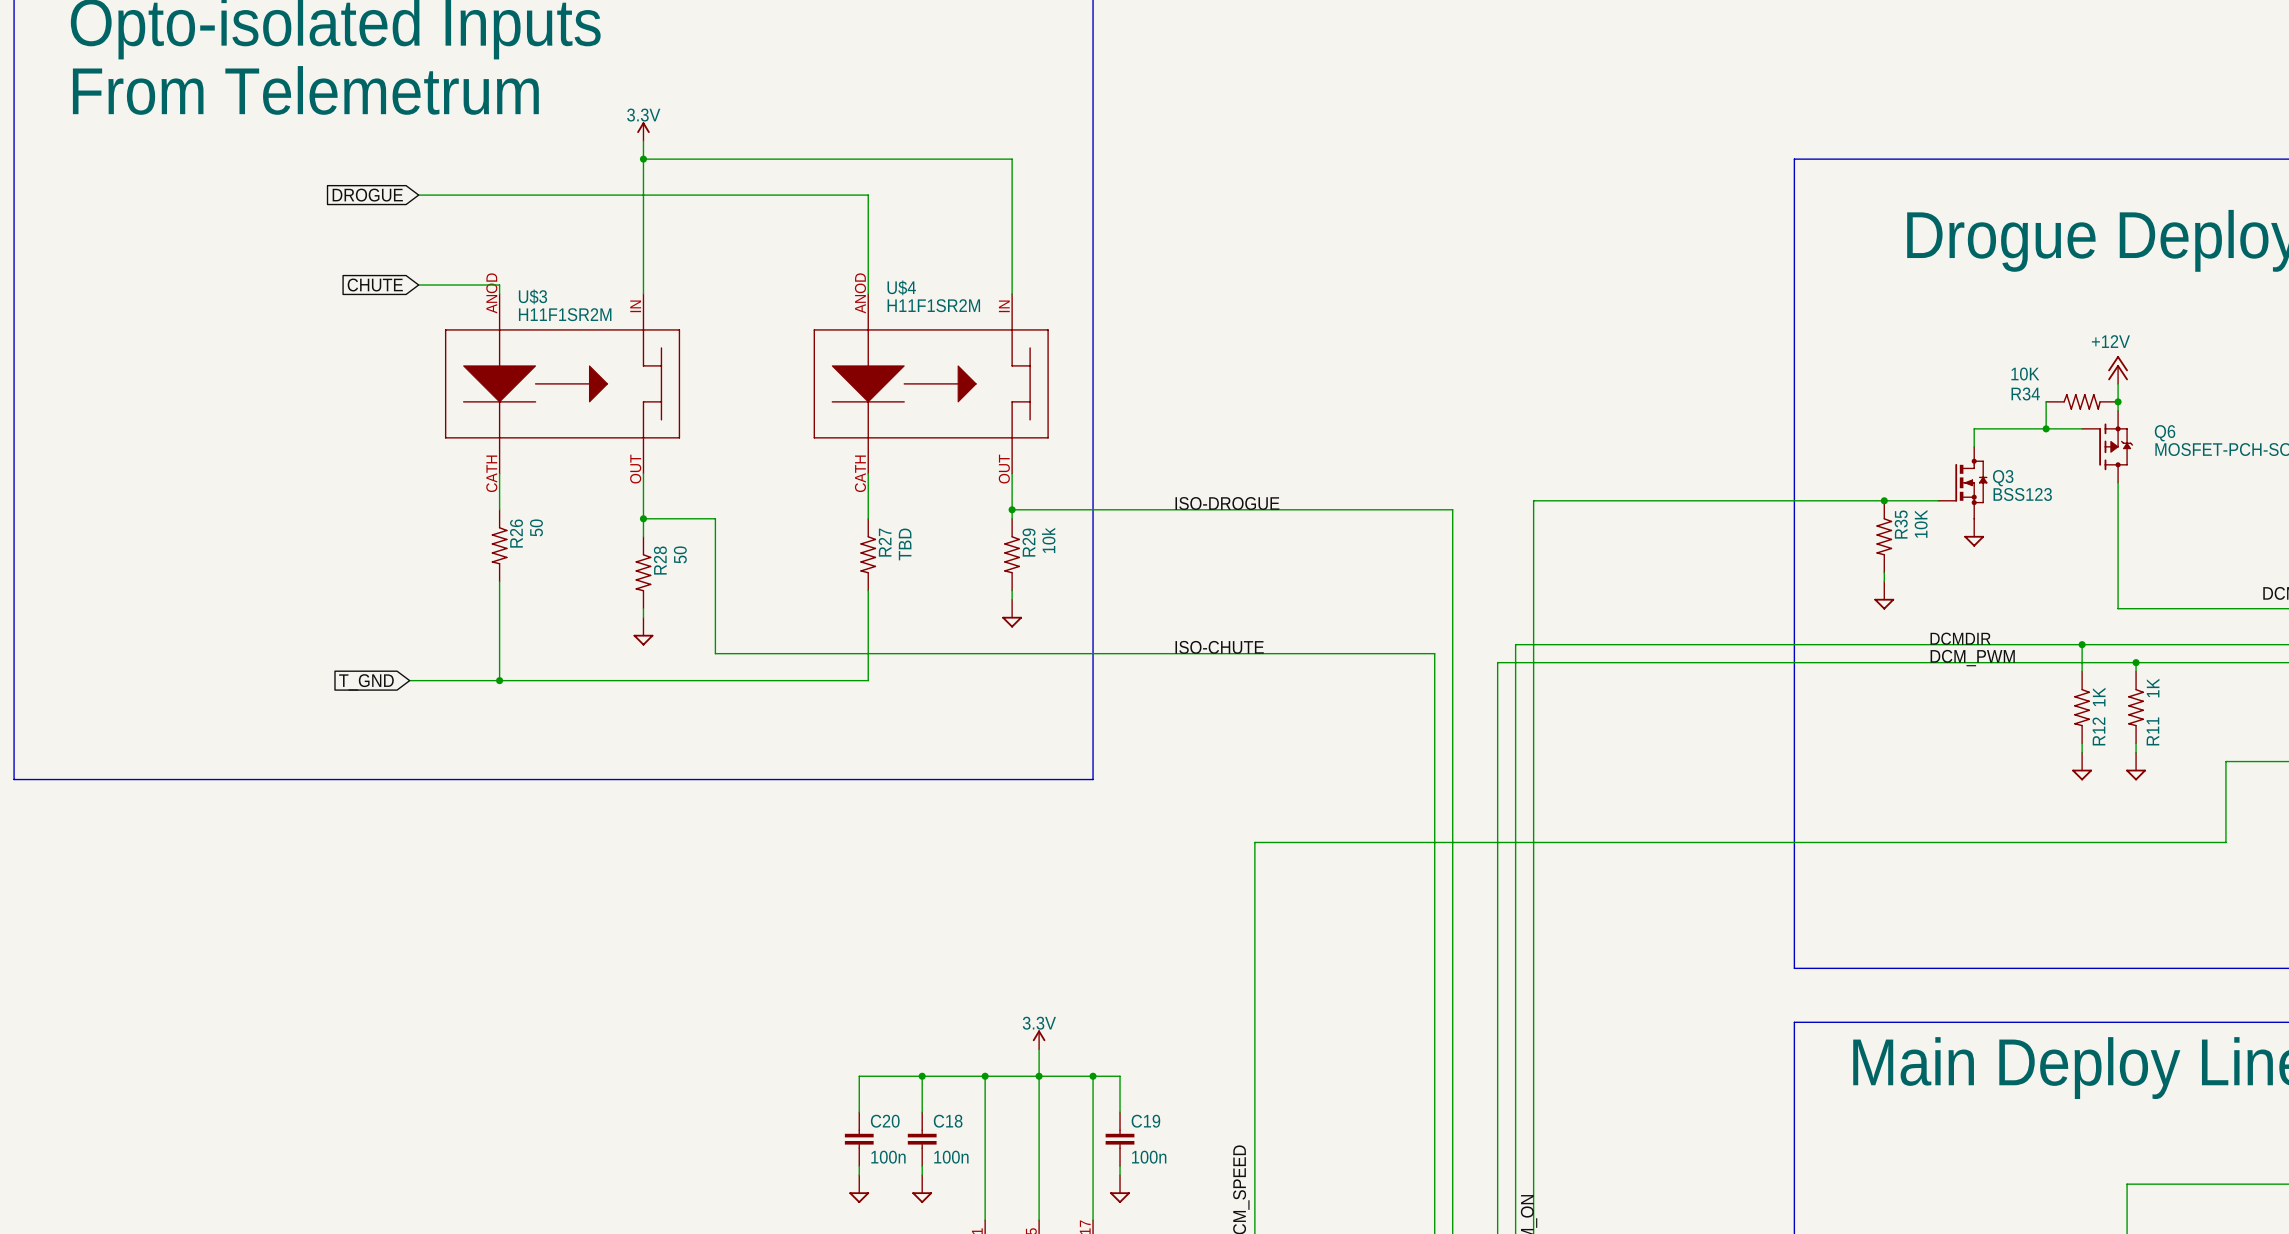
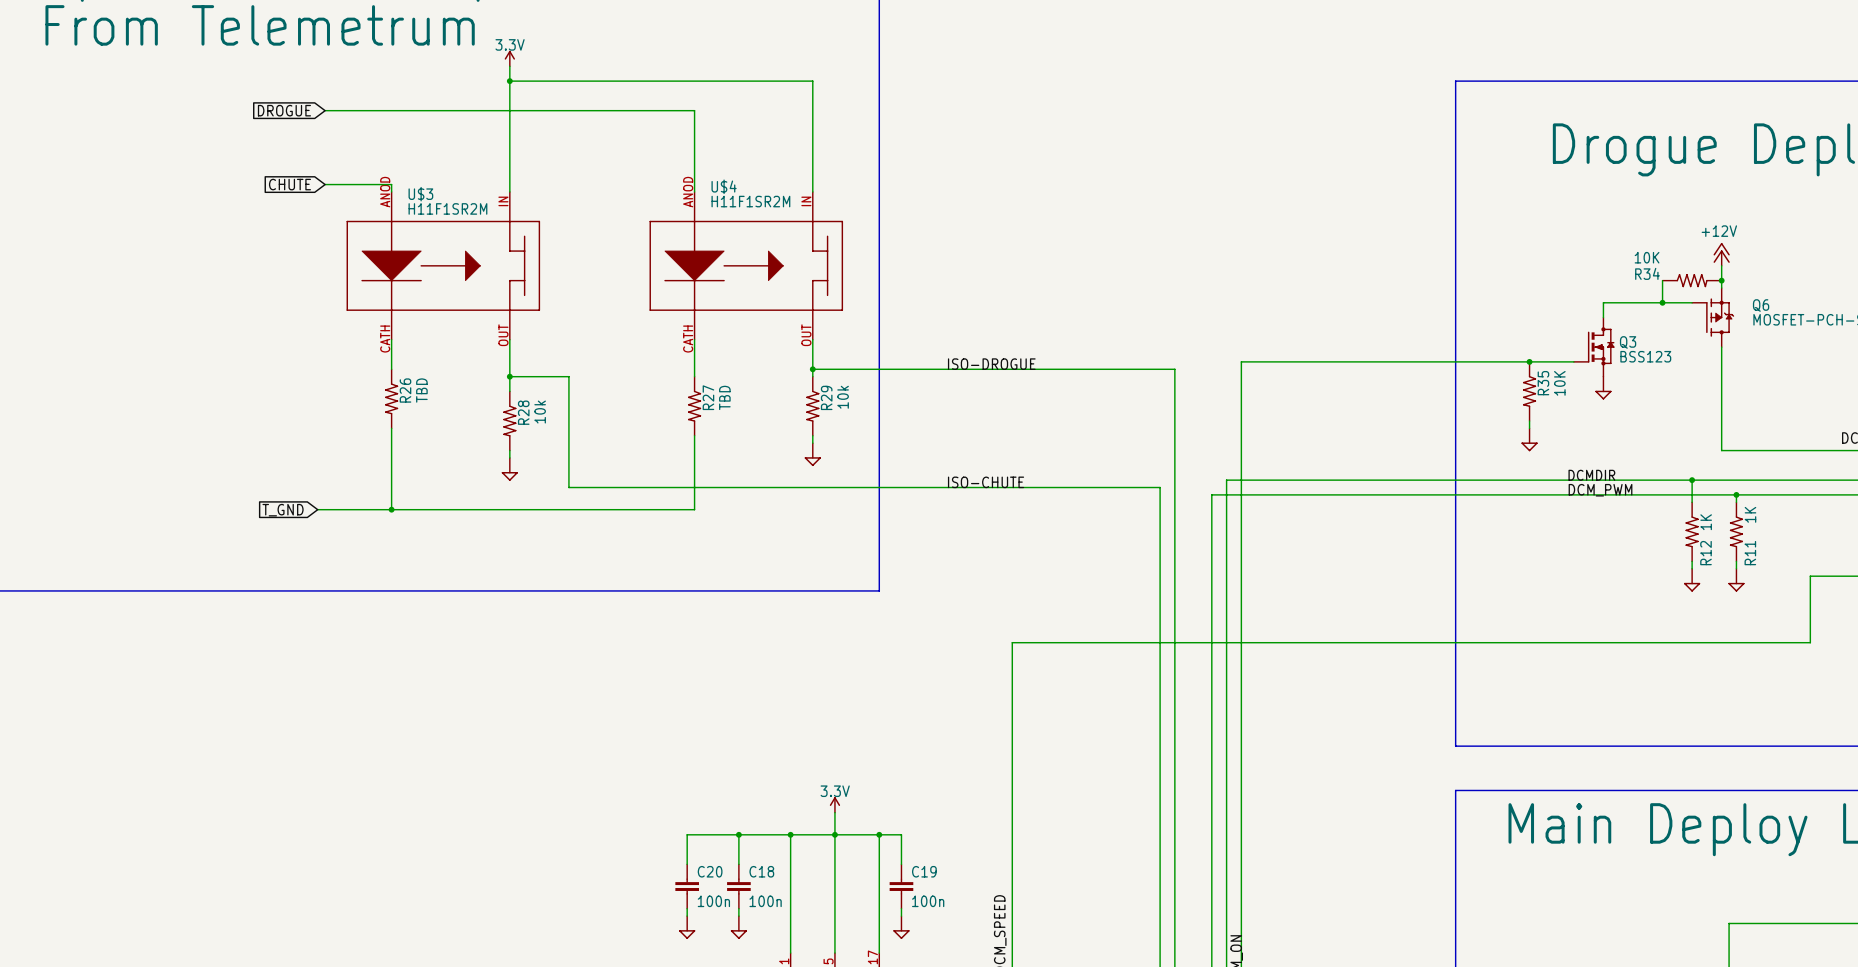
R26 value: 50 (536, 527) -> TBD (421, 390)
R28 value: 50 (680, 554) -> 10k (540, 412)

